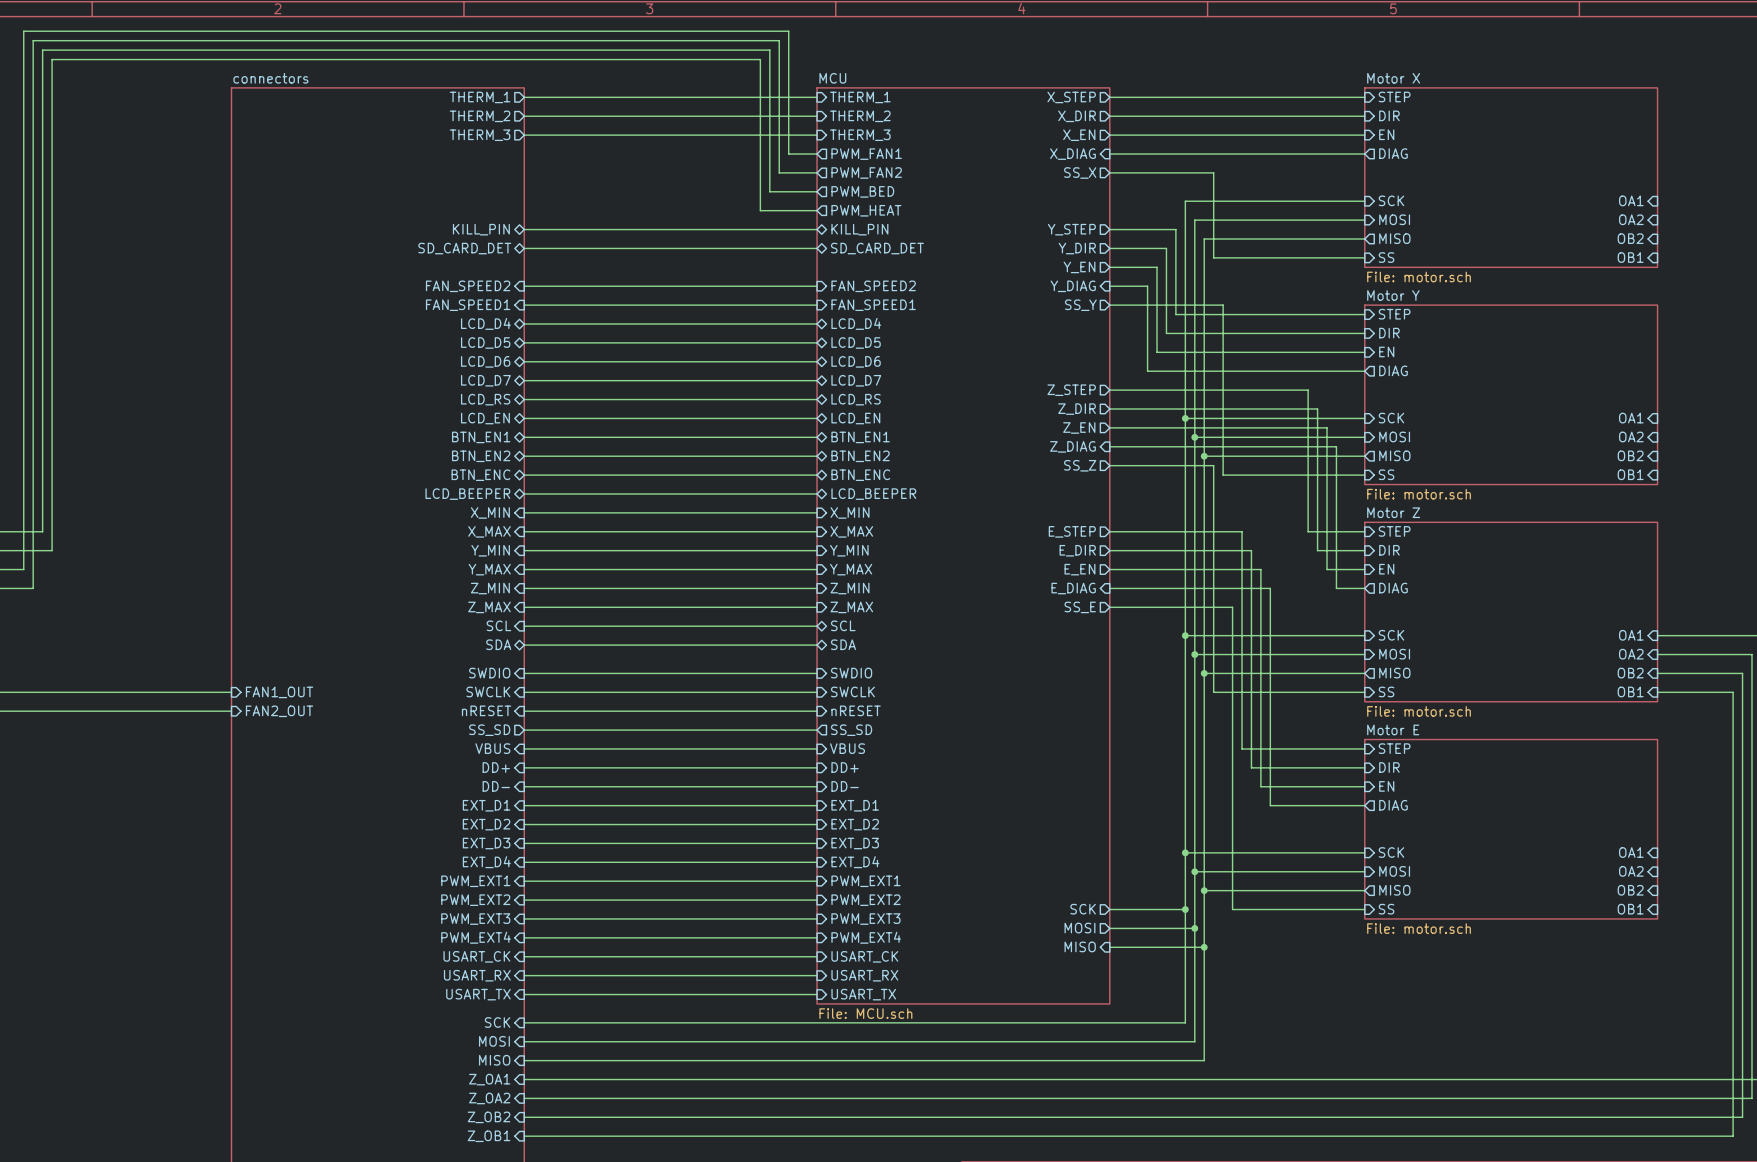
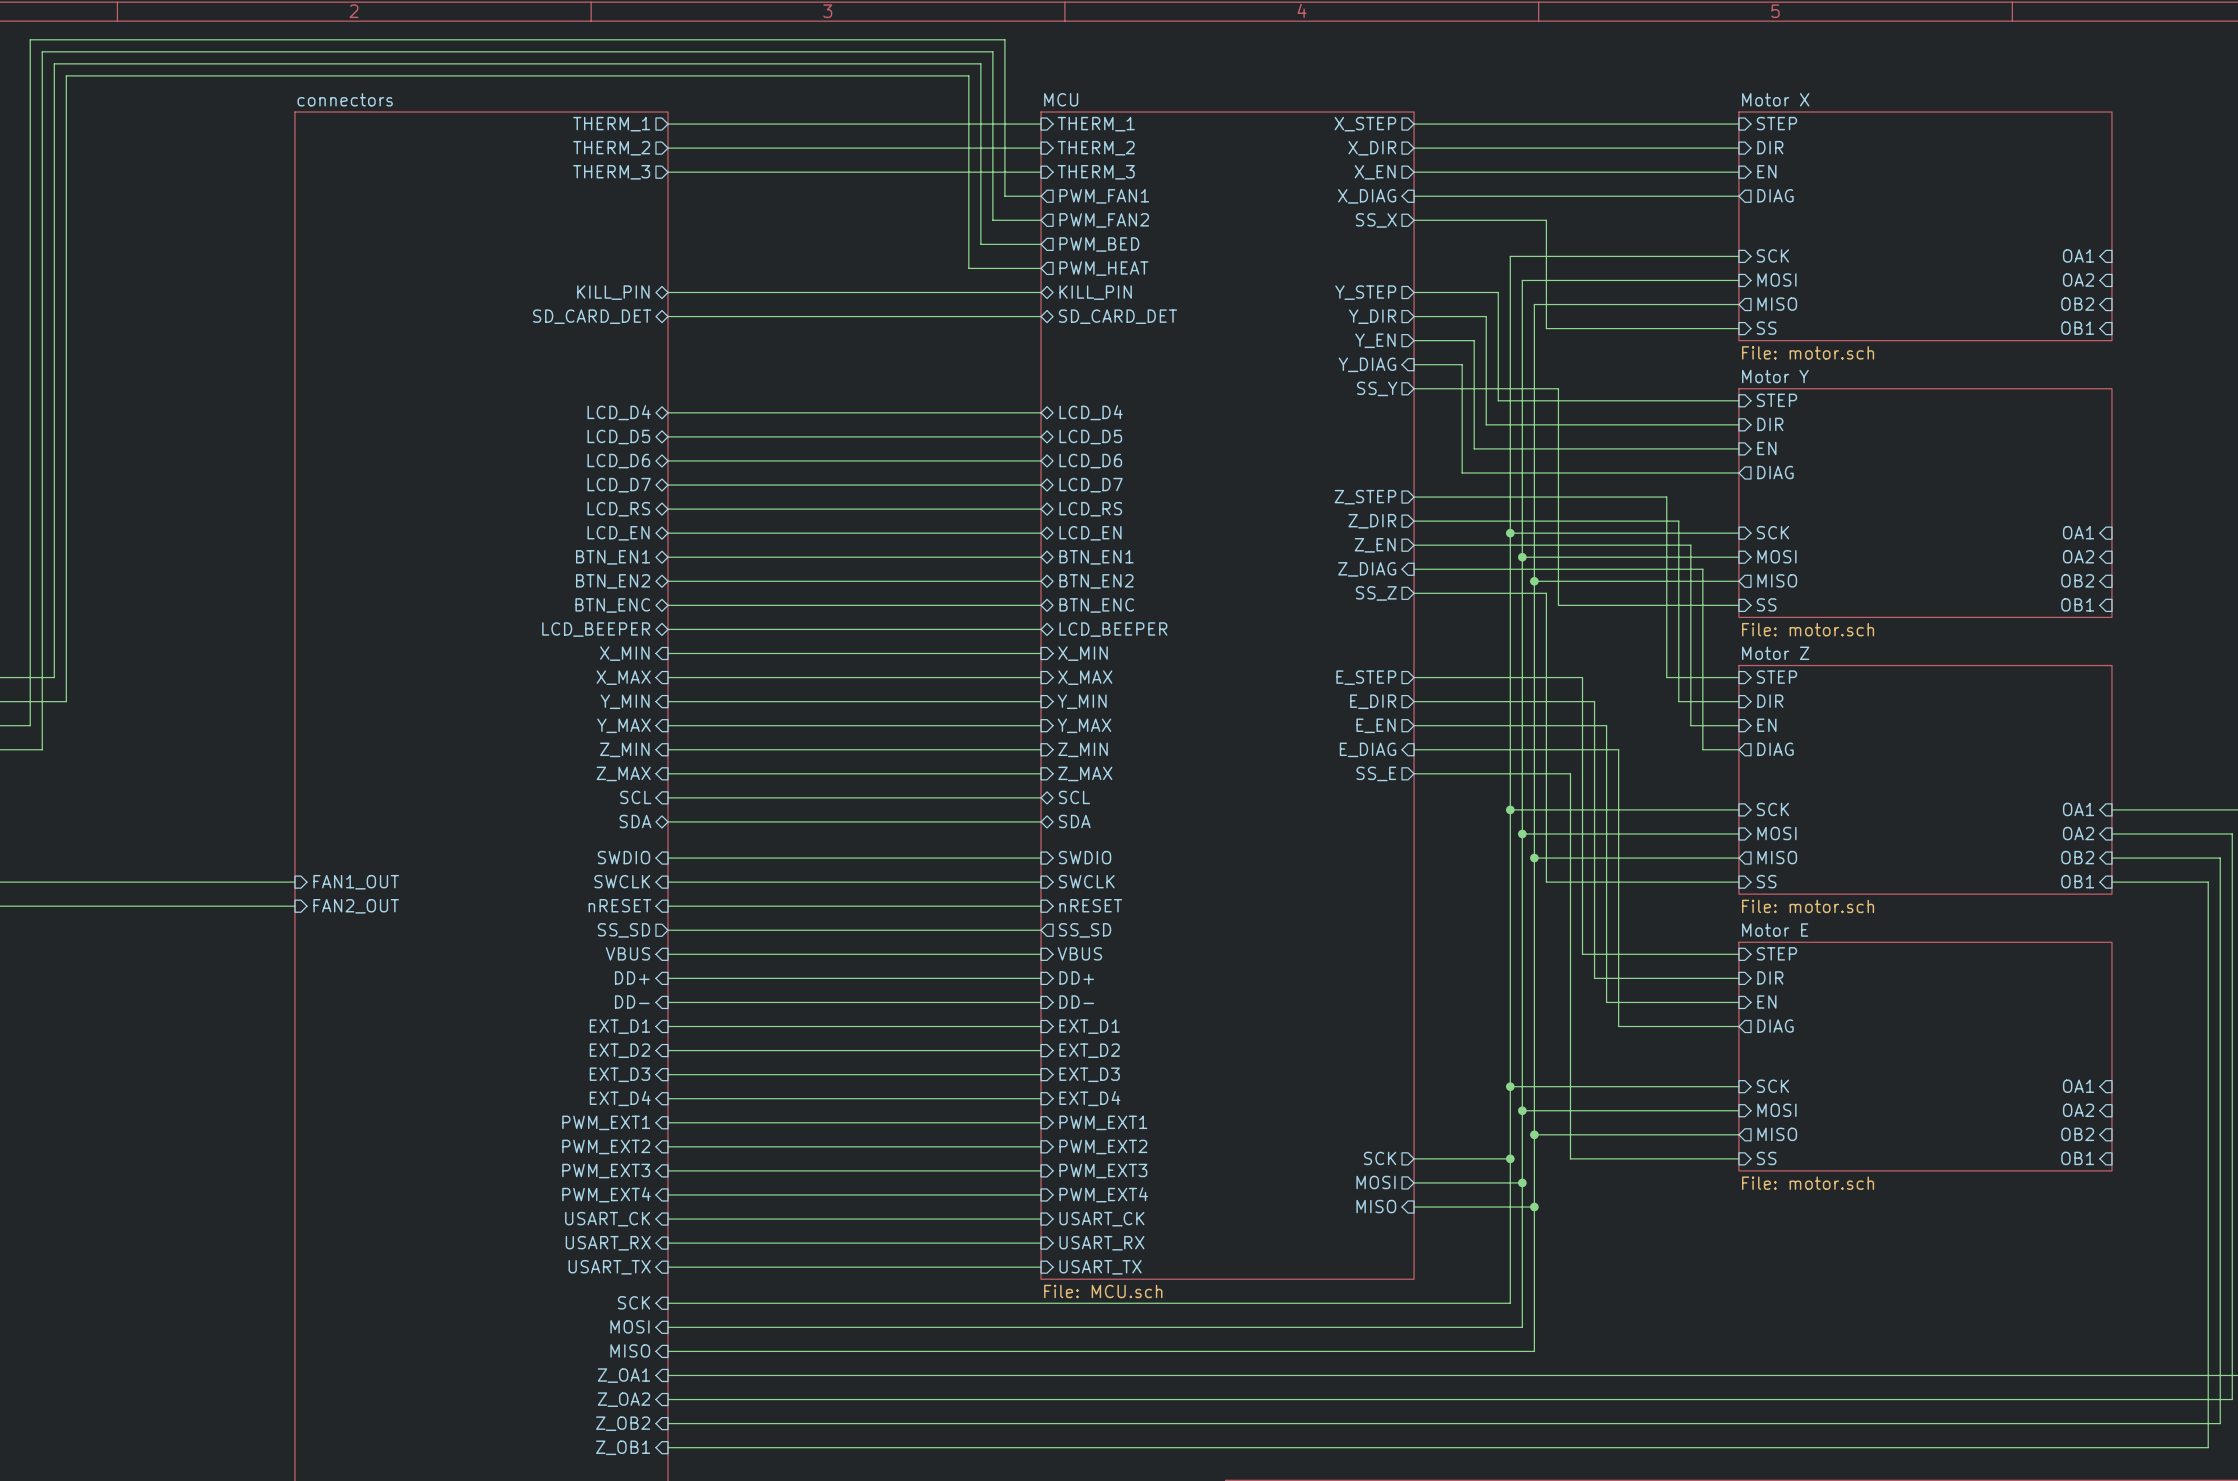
sheet pin: FAN_SPEED2 (468, 286) -> none
wire: (524, 286) (817, 286) -> none
sheet pin: FAN_SPEED2 (873, 286) -> none
sheet pin: FAN_SPEED1 (468, 305) -> none
wire: (524, 305) (817, 305) -> none
sheet pin: FAN_SPEED1 (873, 305) -> none

